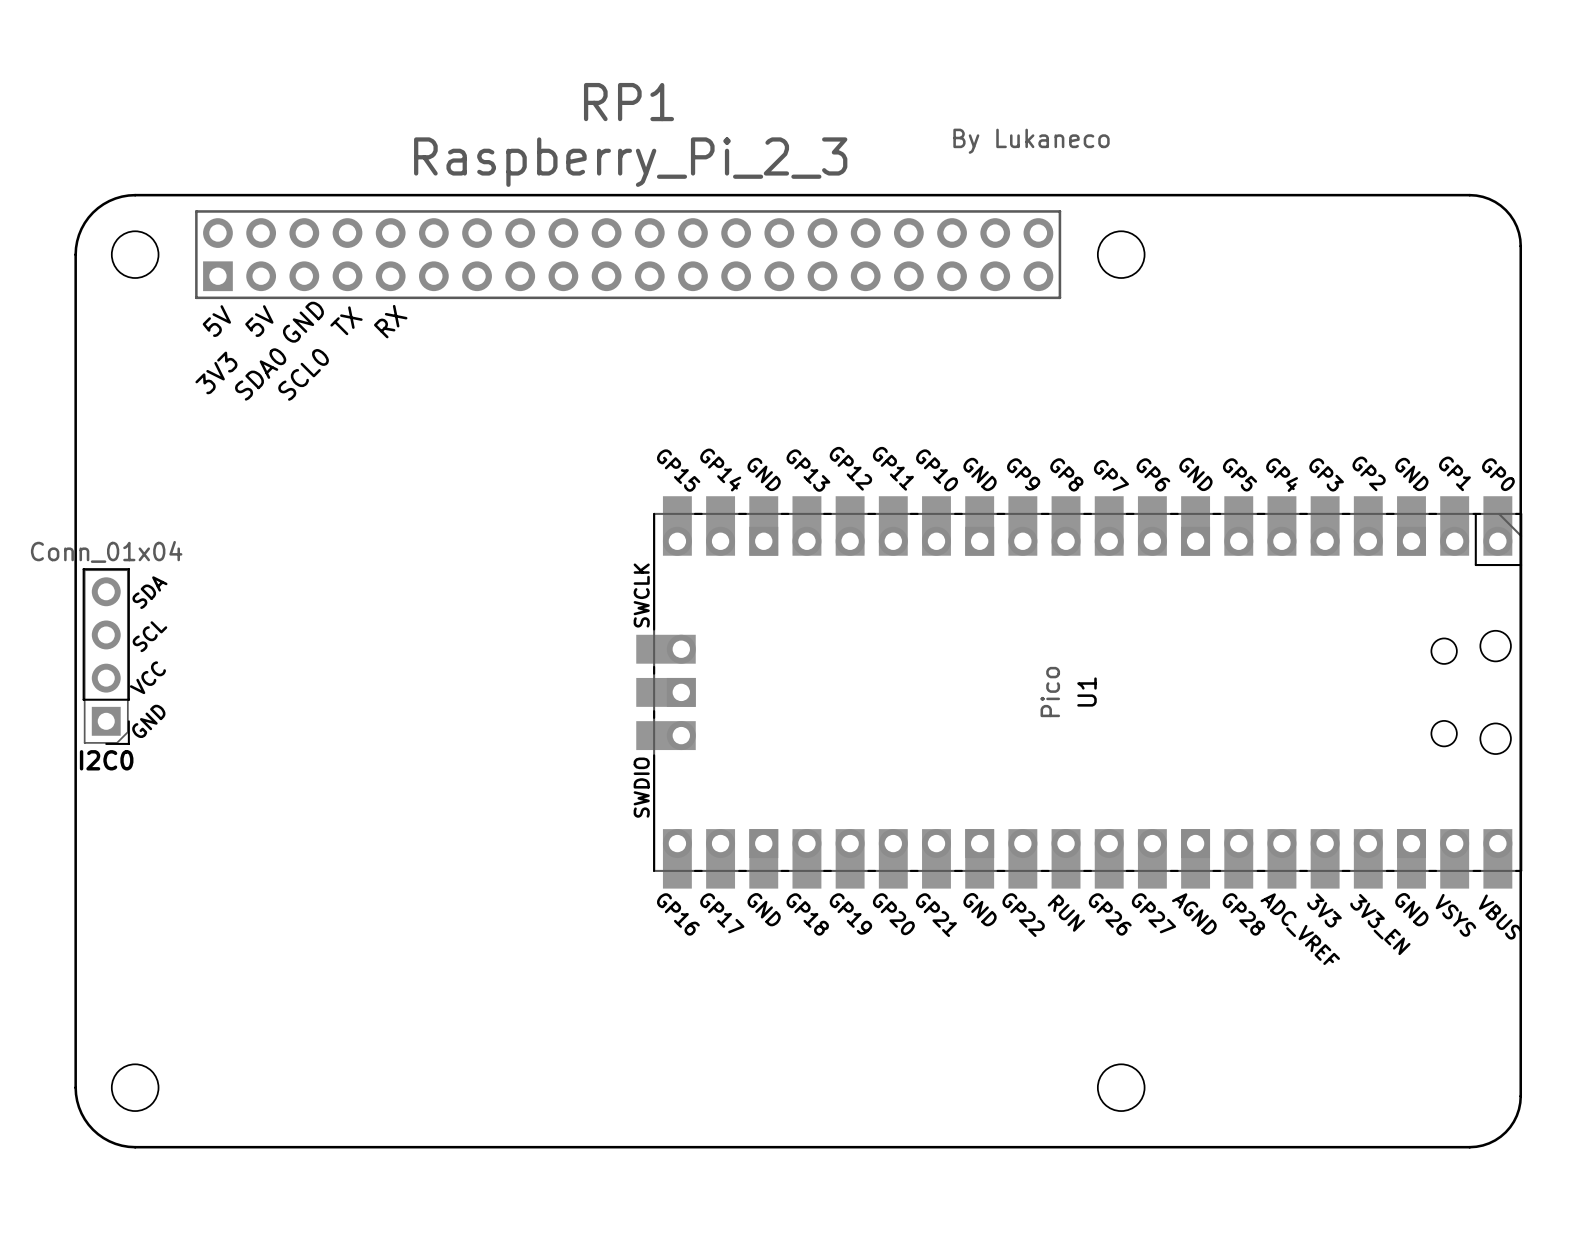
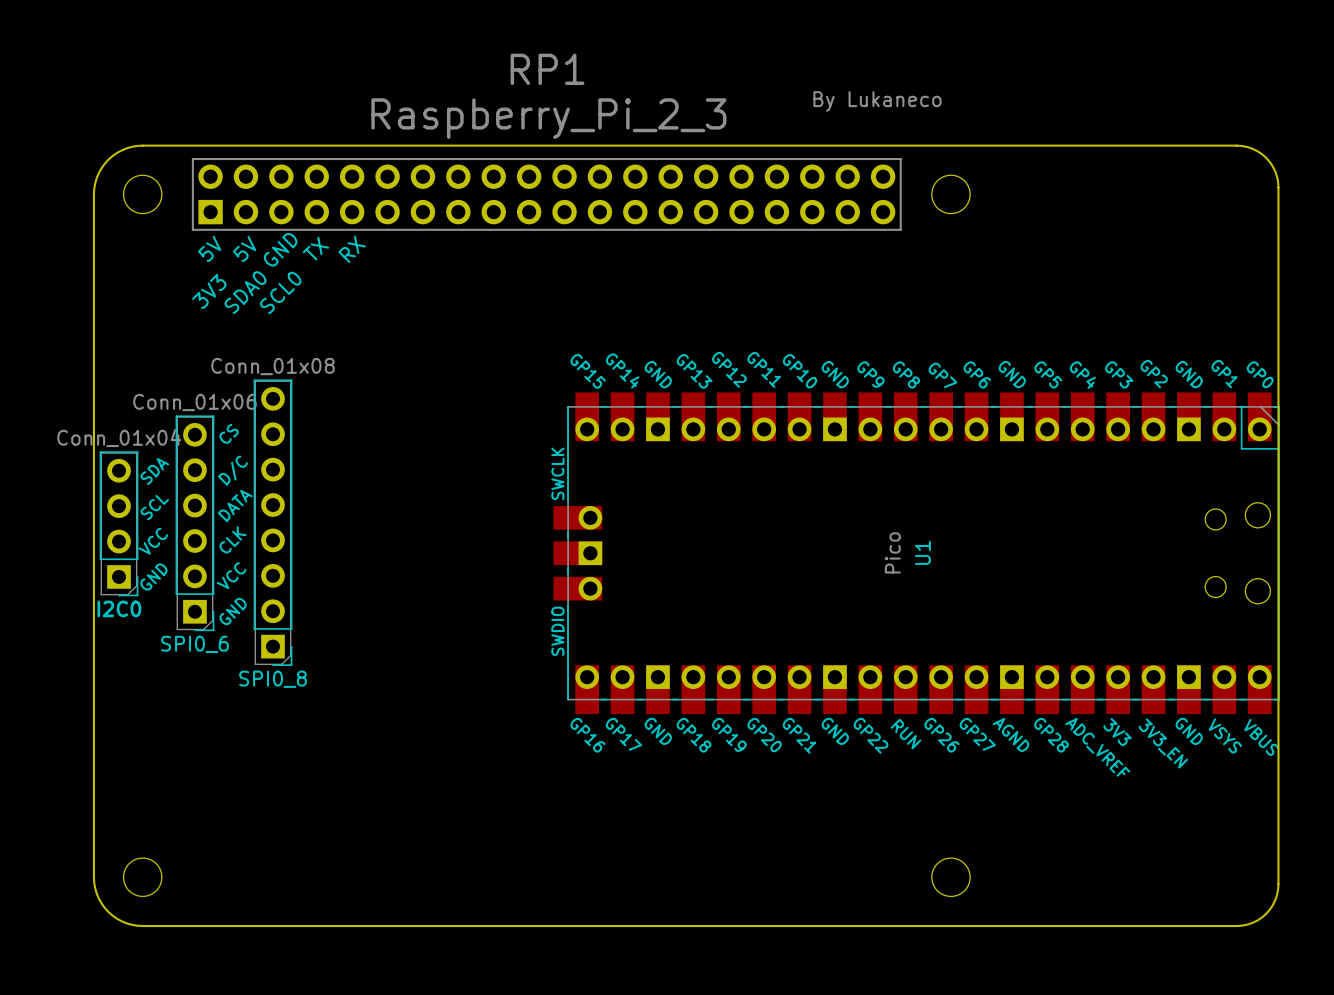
text: none -> CS (229, 433)
text: none -> D/C (232, 470)
text: none -> DATA (235, 505)
SPI0_6: none -> Conn_01x06 (194, 523)
SPI0_8: none -> Conn_01x08 (273, 522)
text: none -> CLK (233, 539)
text: none -> VCC (231, 575)
text: none -> GND (233, 611)

